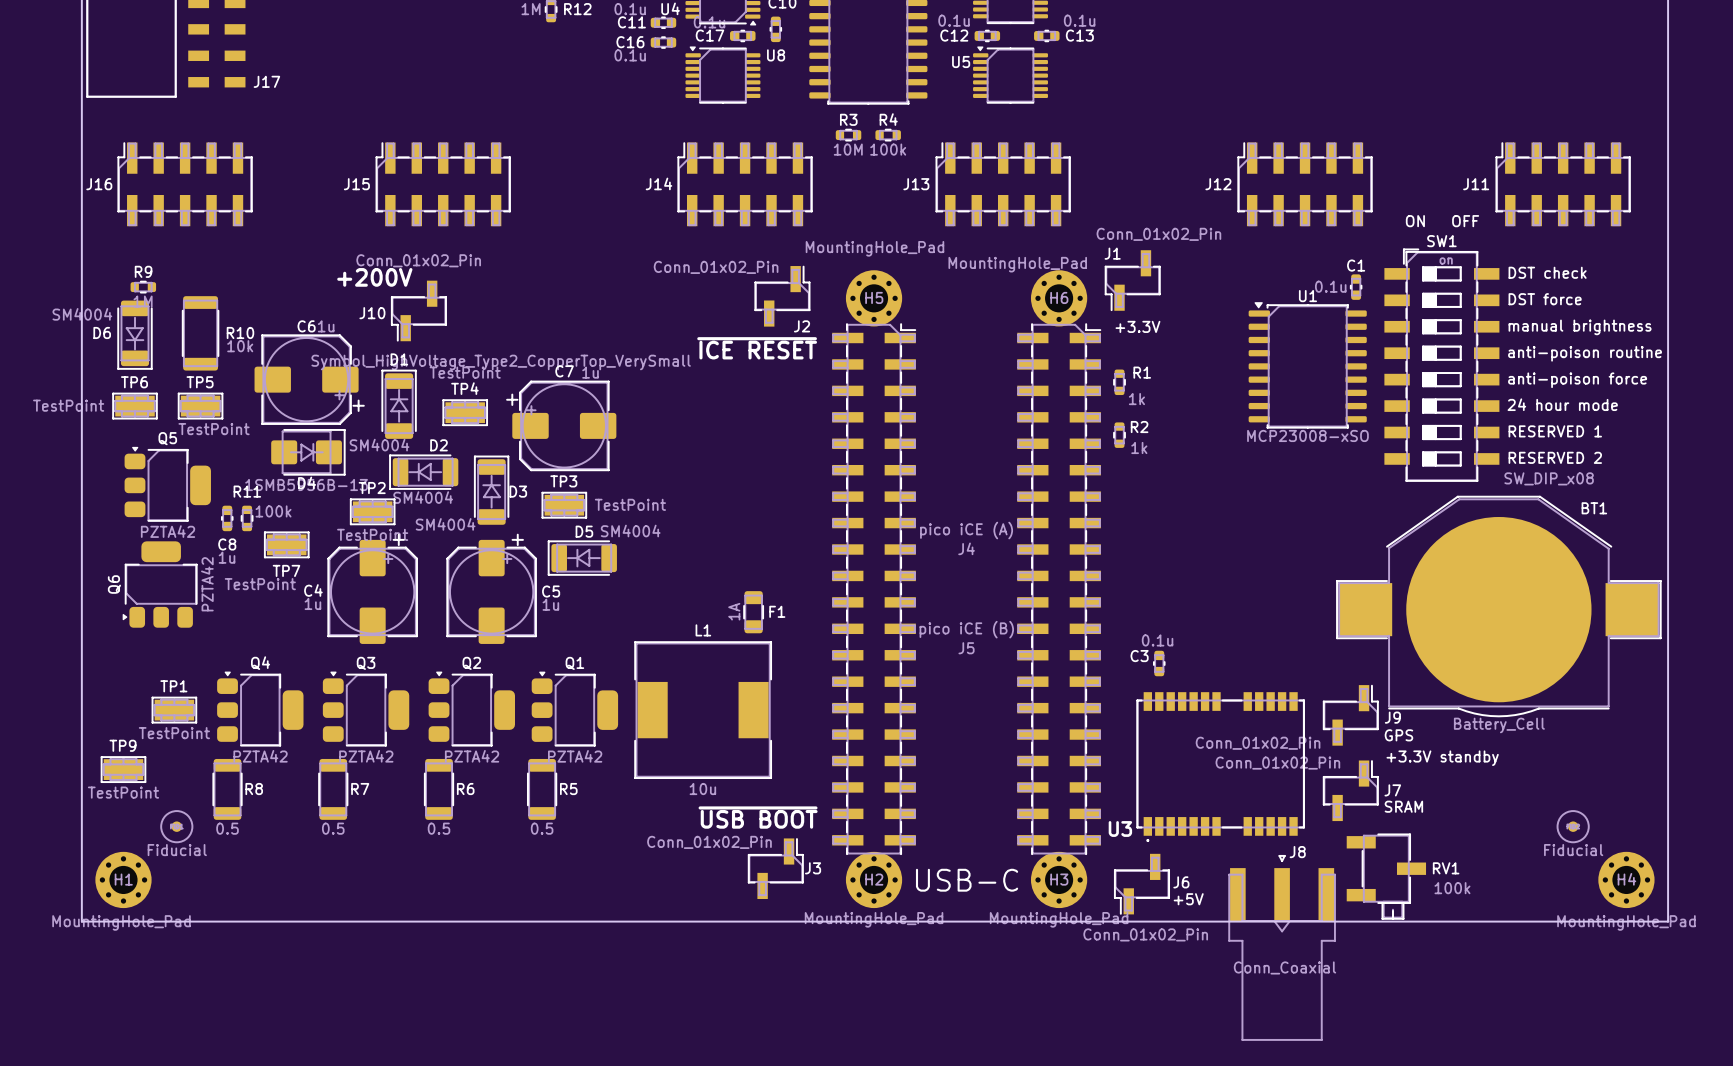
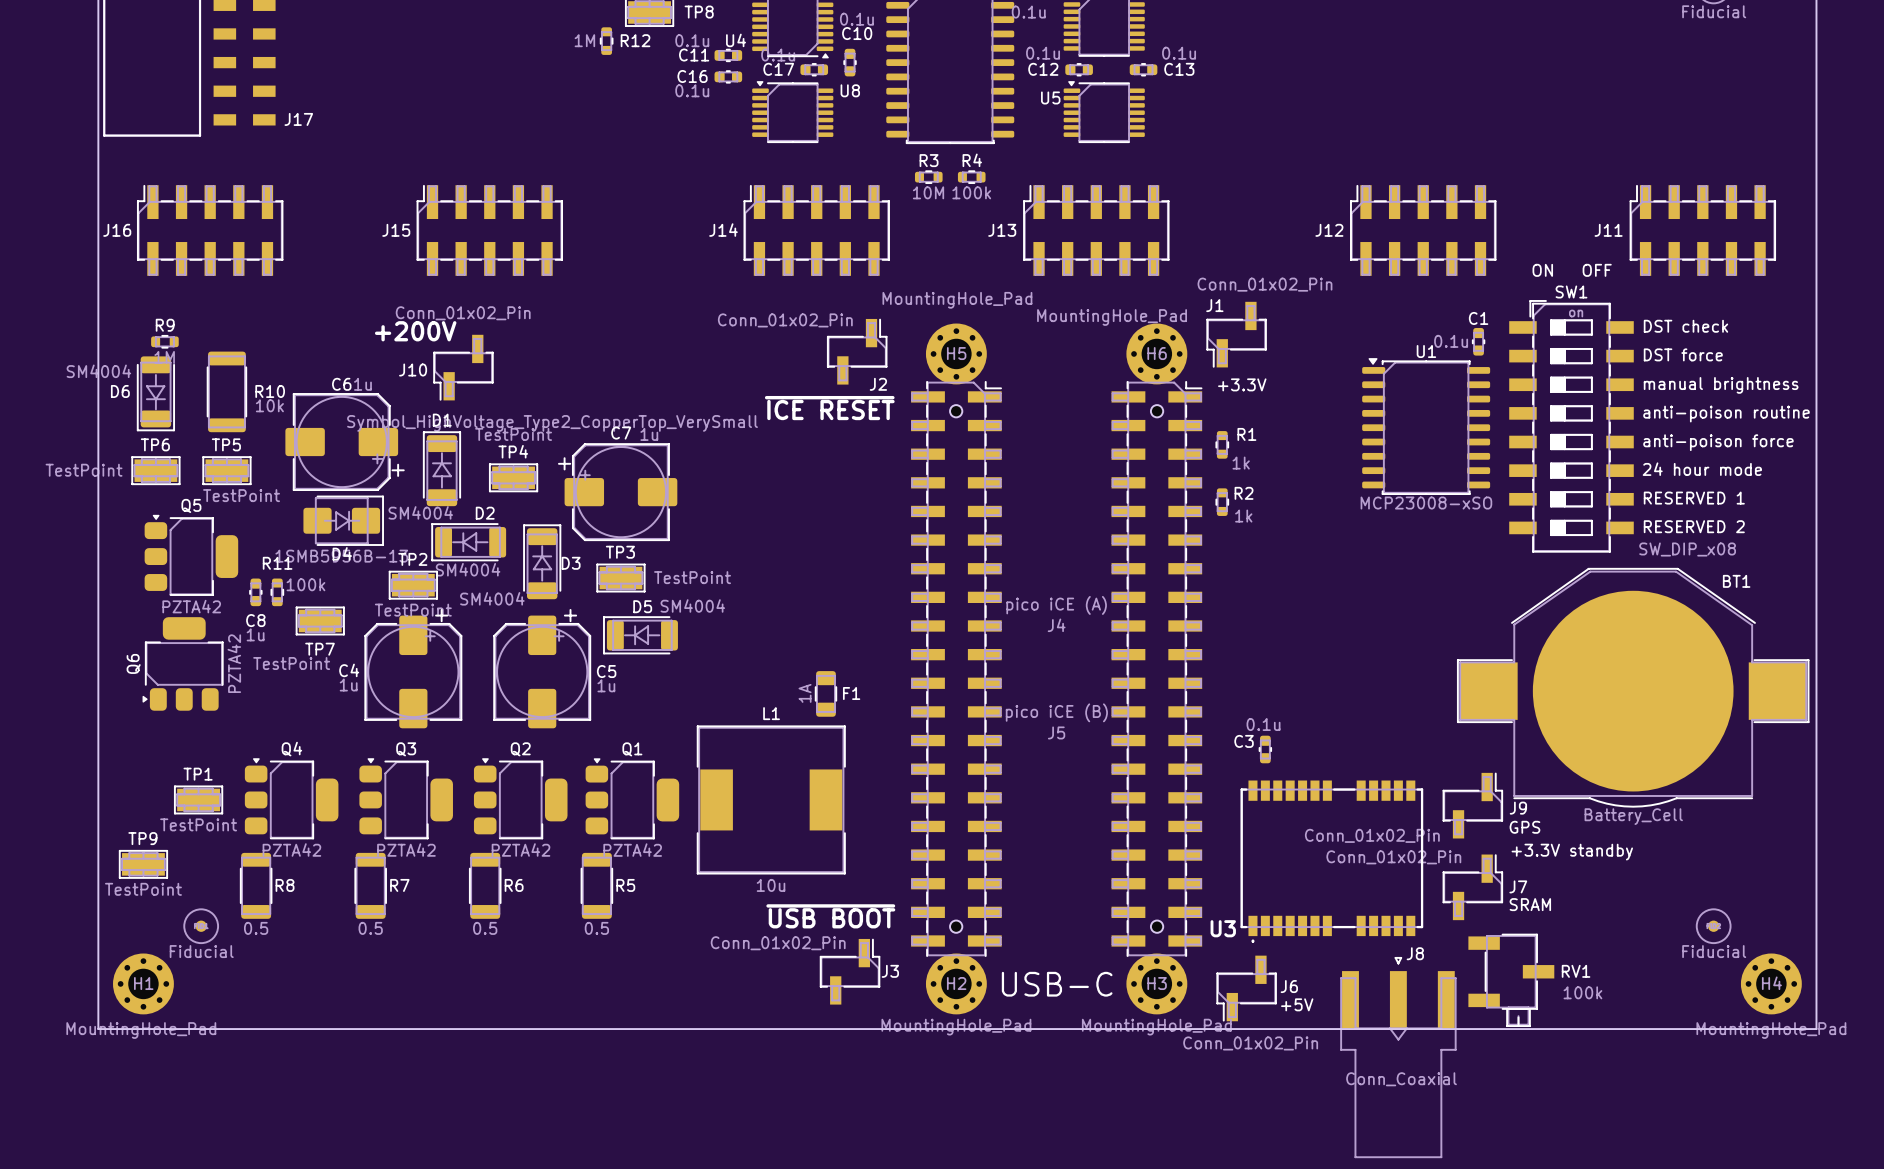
J4 footprint: [832, 323, 916, 855] -> [911, 381, 1002, 957]
J5 footprint: [1017, 323, 1101, 855] -> [1111, 381, 1203, 957]

